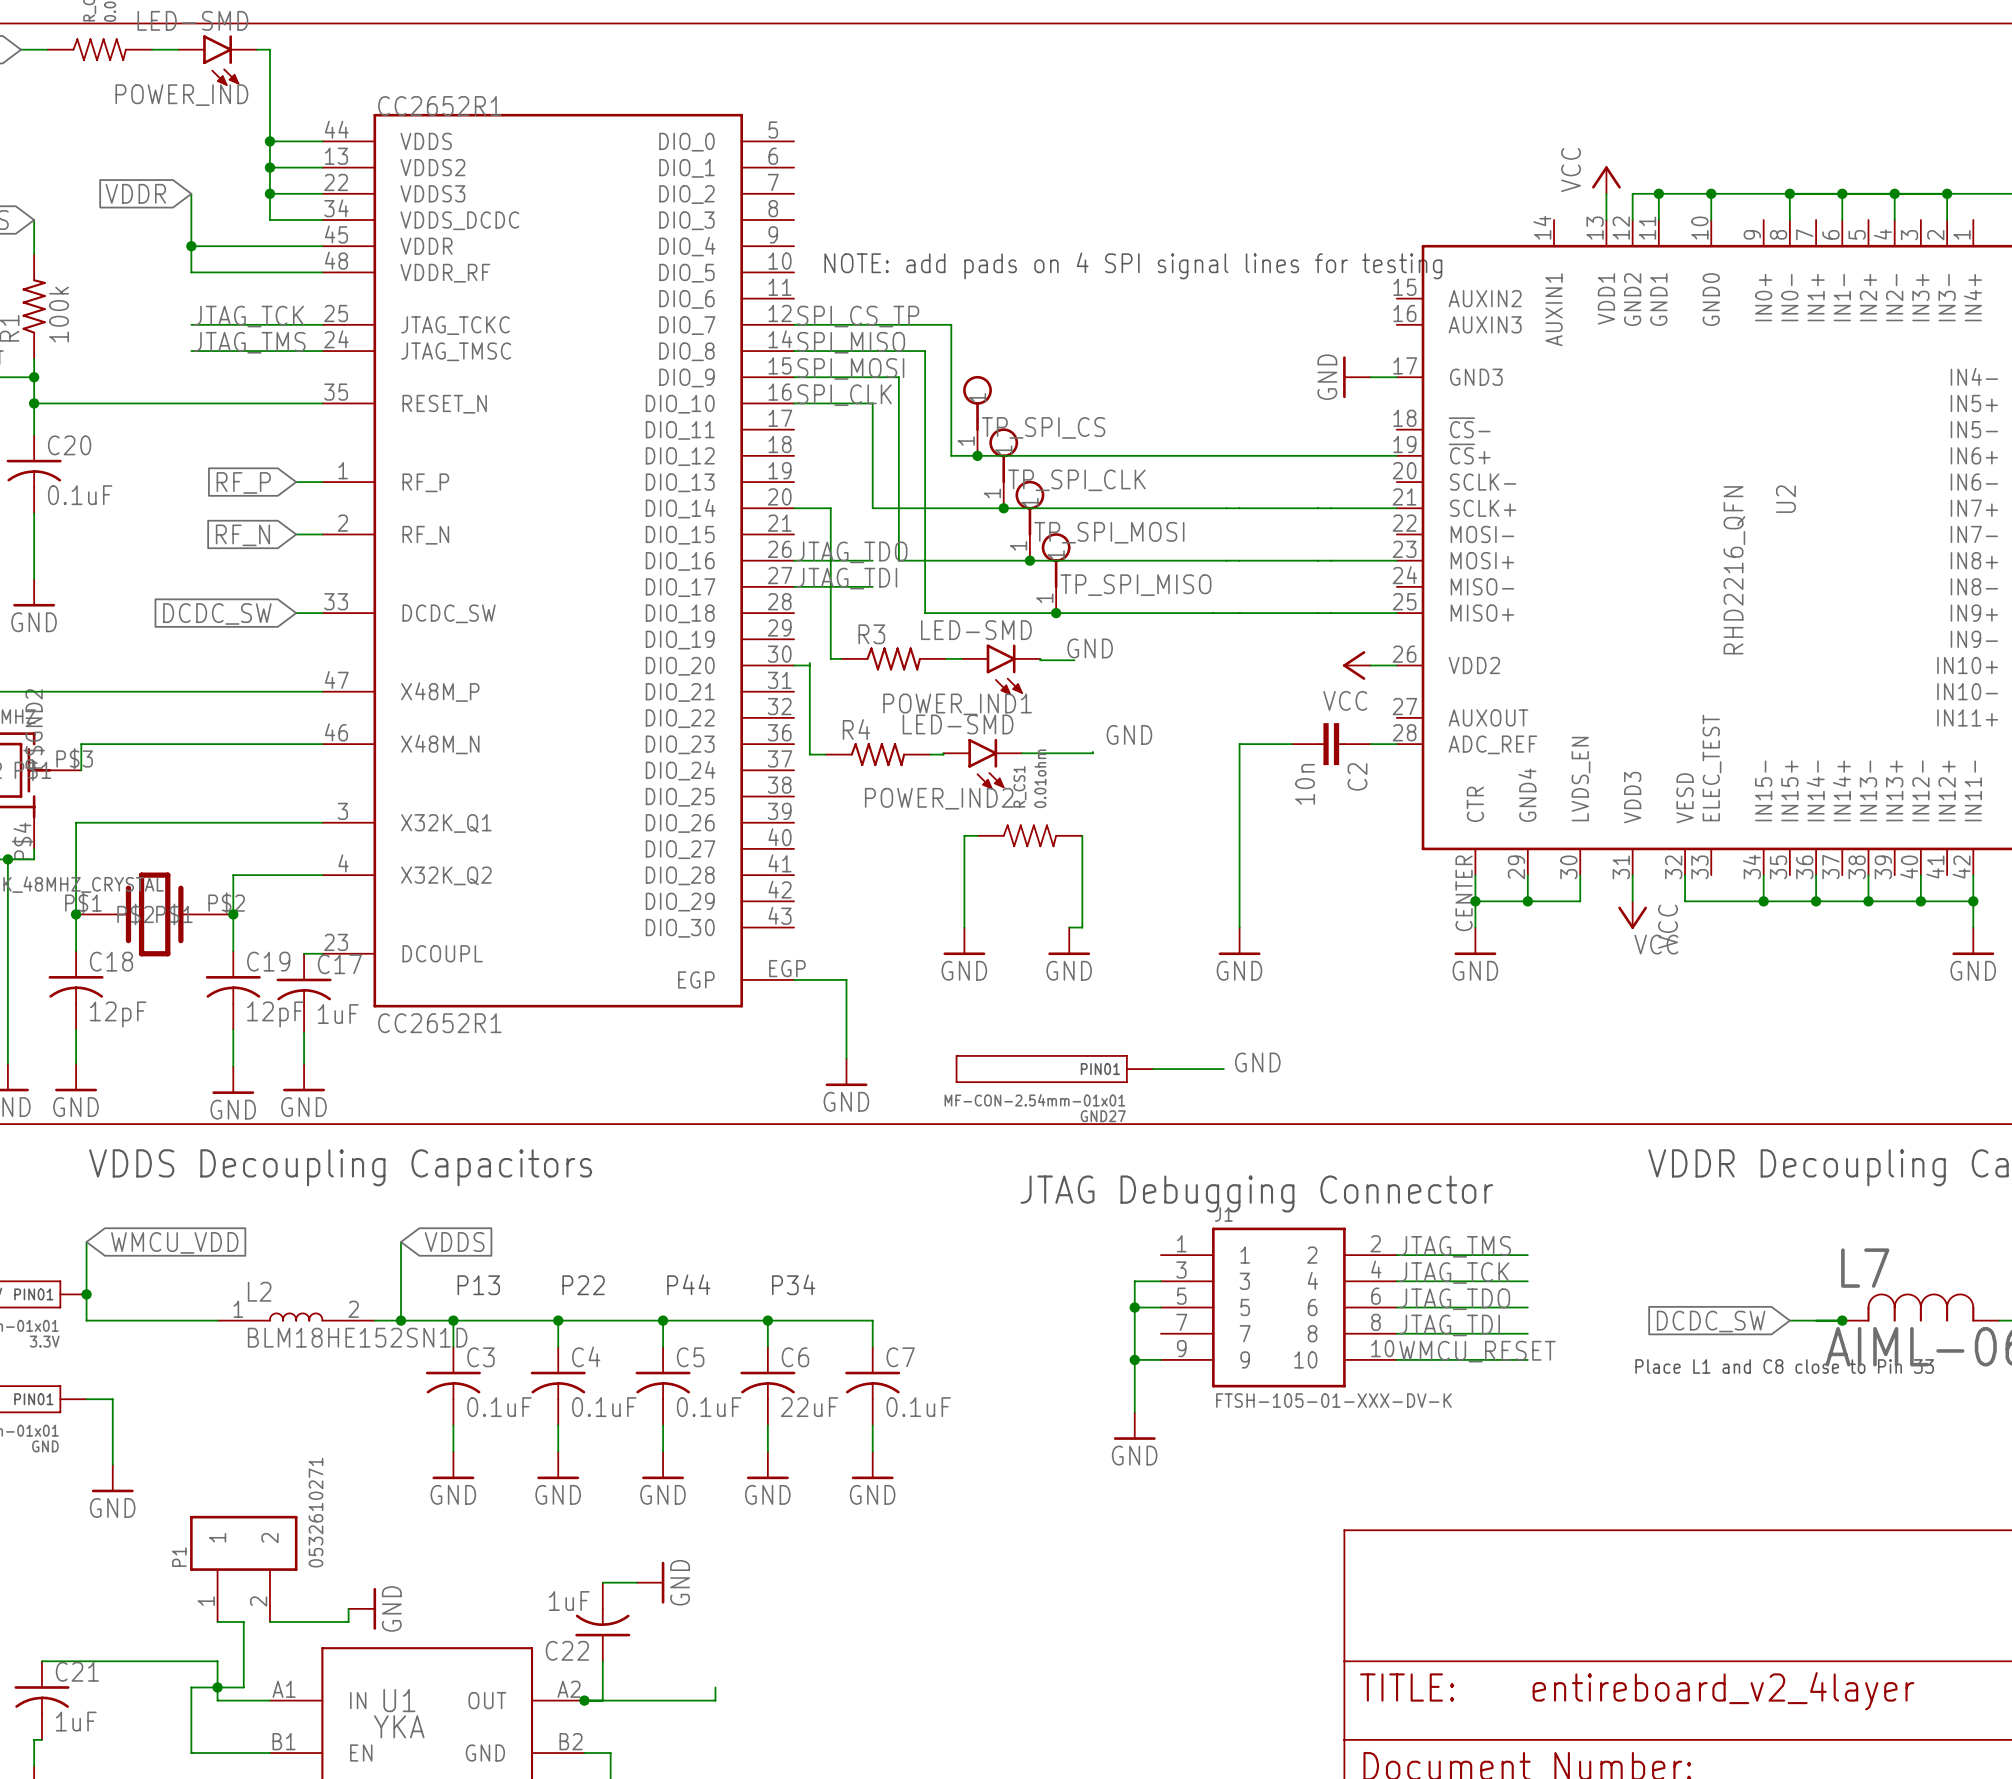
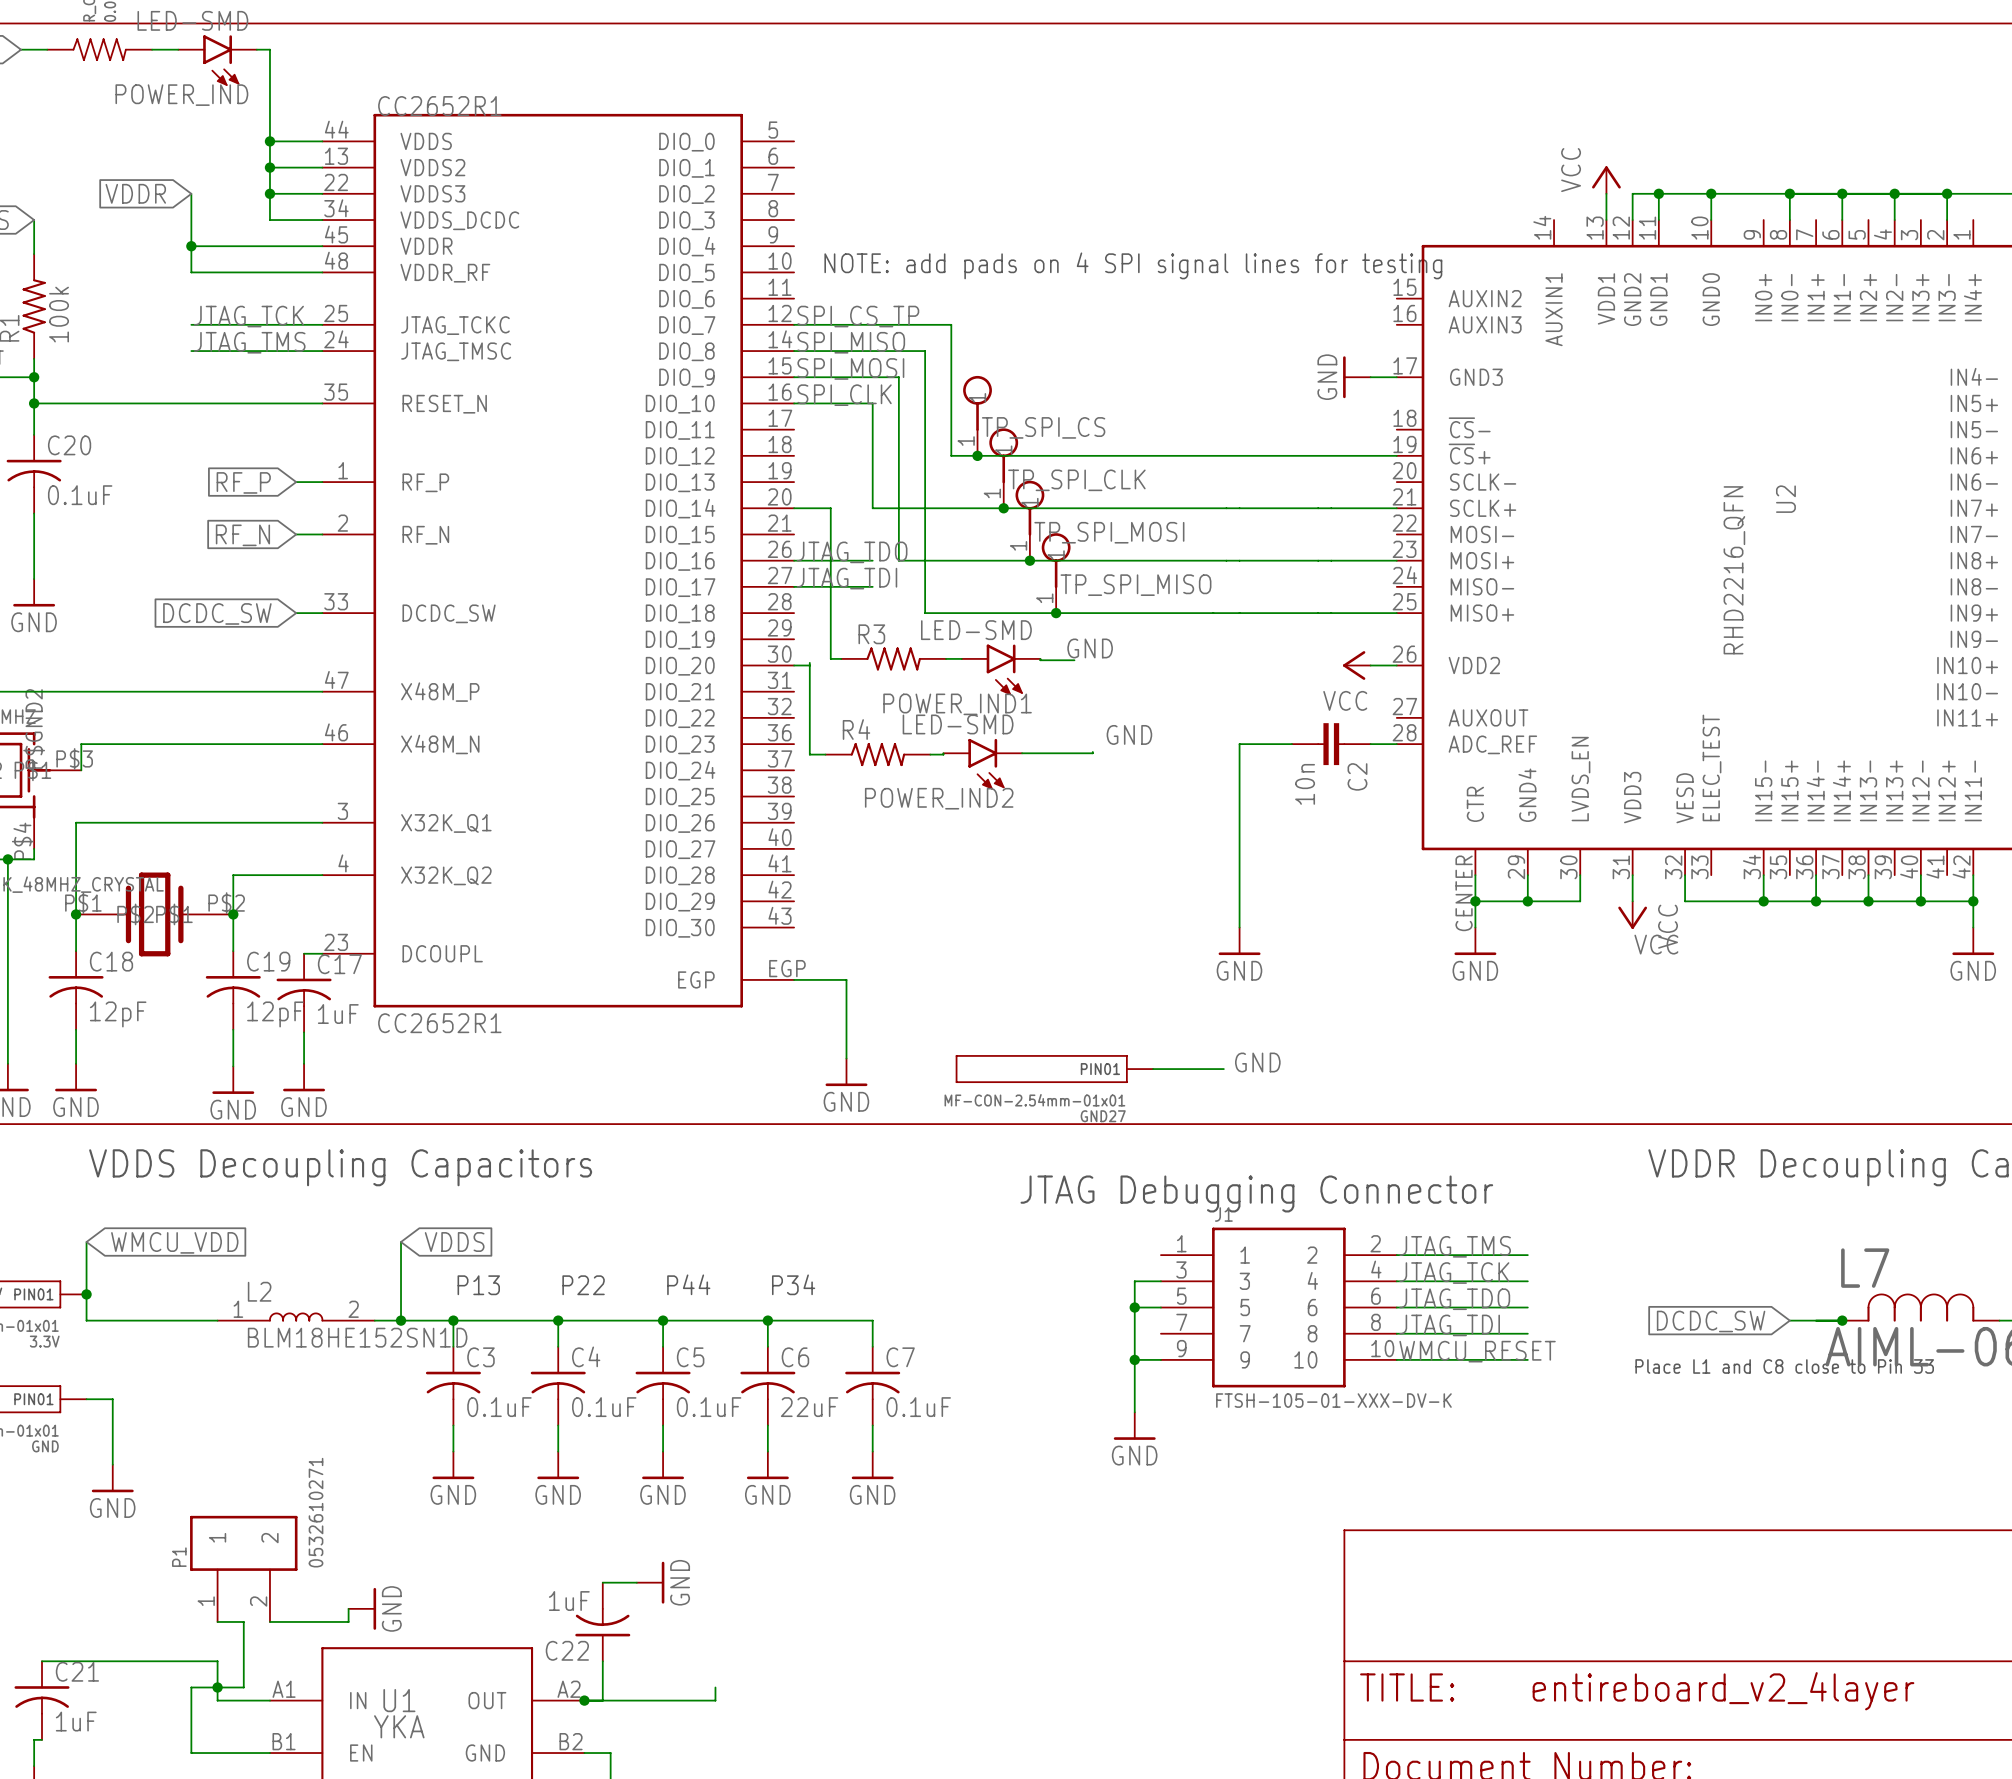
wire: (977, 835) (964, 835) (964, 927) -> none
R_CS1: 0.01ohm (1029, 835) -> none
wire: (1082, 835) (1082, 927) (1069, 927) -> none
power symbol: GND (964, 941) -> none
power symbol: GND (1069, 941) -> none

